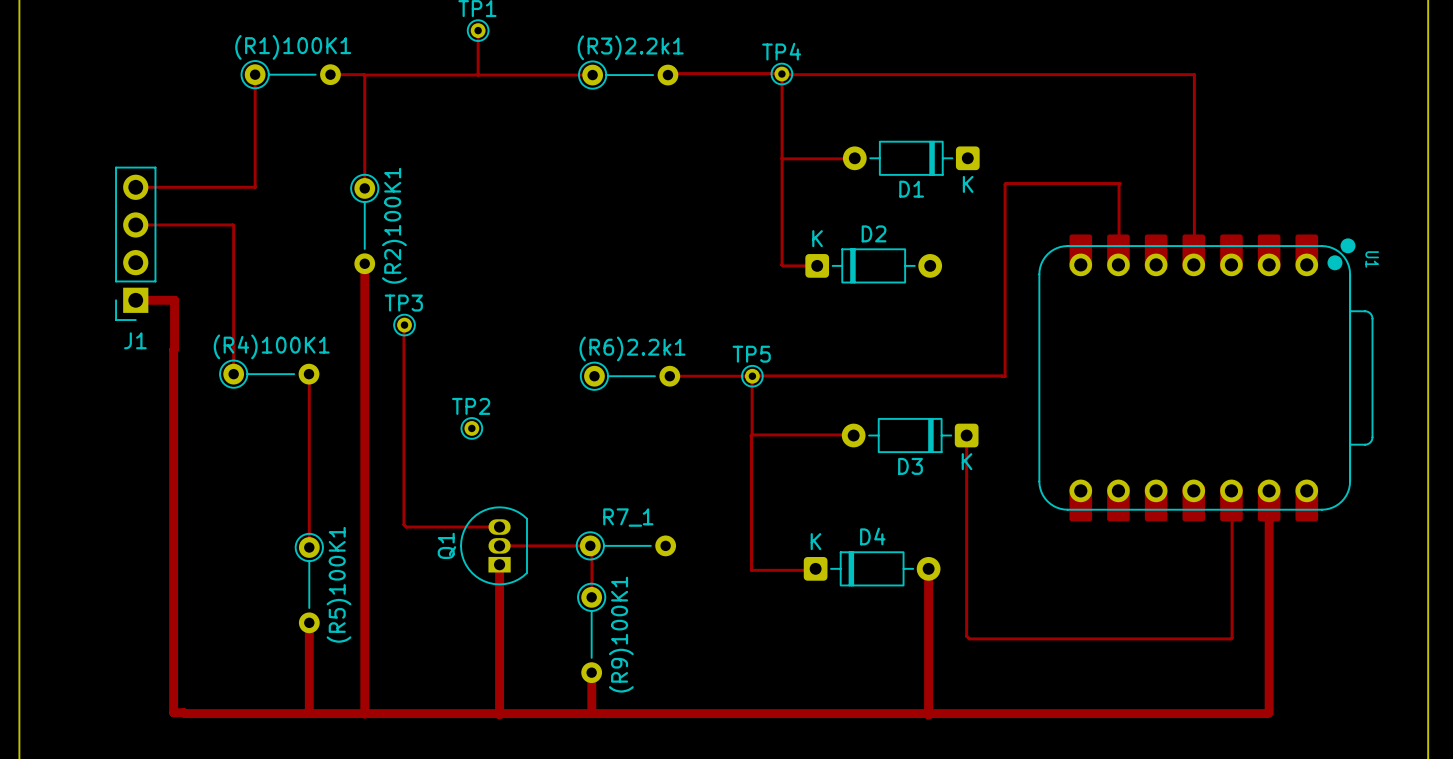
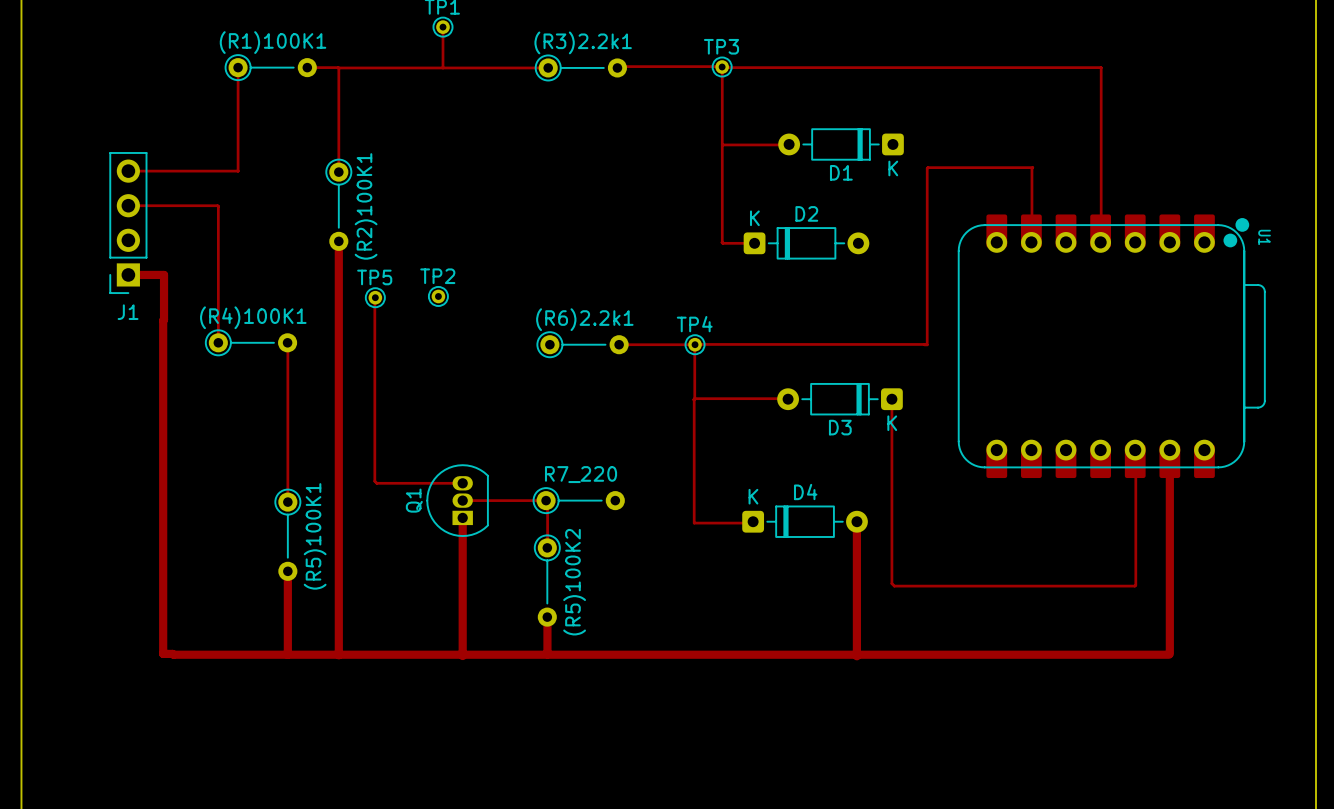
TP4 name: TP4 (781, 51) -> TP3 (721, 46)
TP3 name: TP3 (403, 303) -> TP5 (374, 277)
TP5 name: TP5 (751, 354) -> TP4 (694, 324)
TP2 position: (471, 428) -> (438, 296)
R7_1 name: R7_1 (628, 517) -> R7_220 (581, 474)
(R9)100K1 name: (R9)100K1 (621, 634) -> (R5)100K2 (574, 582)

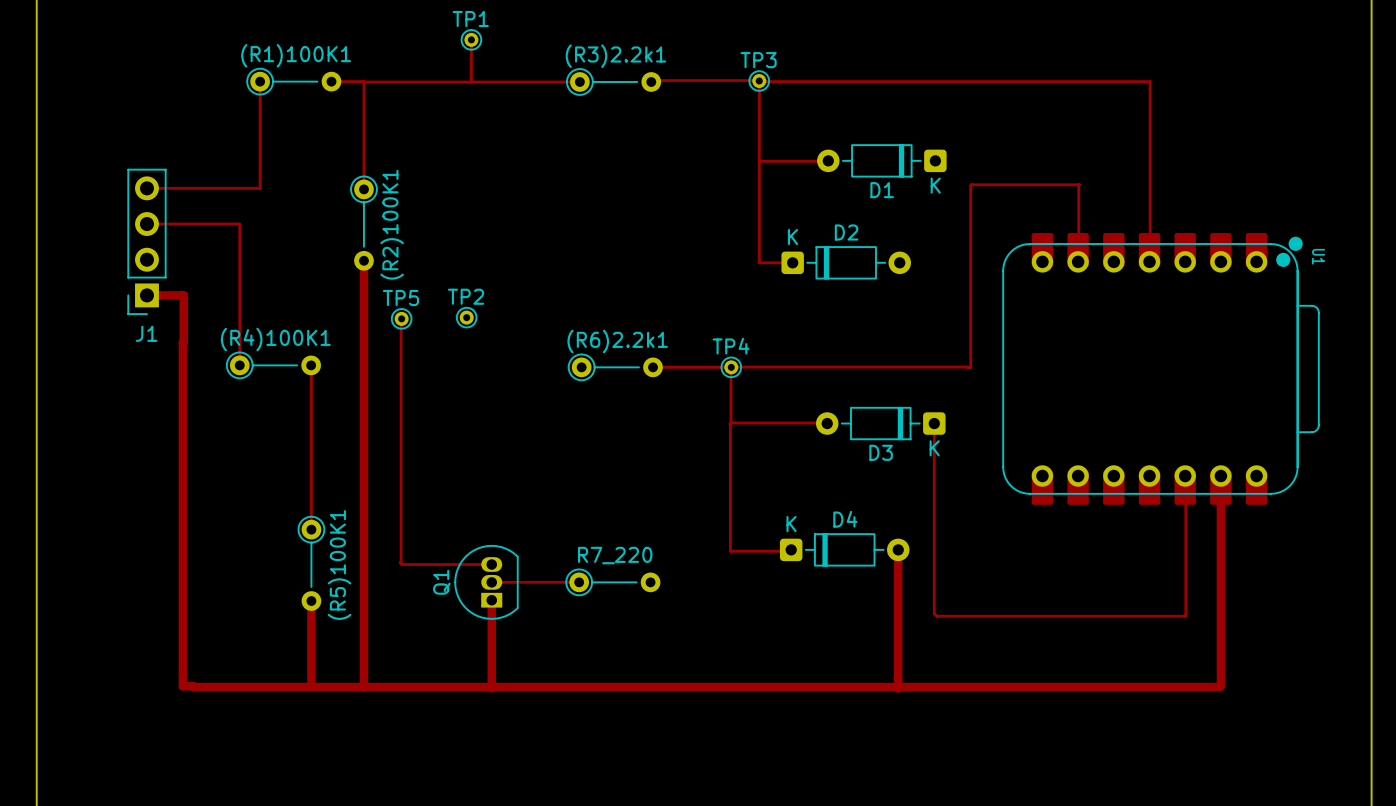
track: (374, 481) (376, 483) (462, 483) -> (401, 508) (400, 562) (402, 564) (491, 564)
Q1 position: (457, 500) -> (486, 582)
track: (462, 500) (547, 499) (547, 542) -> none
R7_220 position: (578, 500) -> (612, 582)
track: none -> (491, 582) (579, 582)
(R5)100K2: (547, 580) -> none
track: (547, 611) (547, 654) -> none

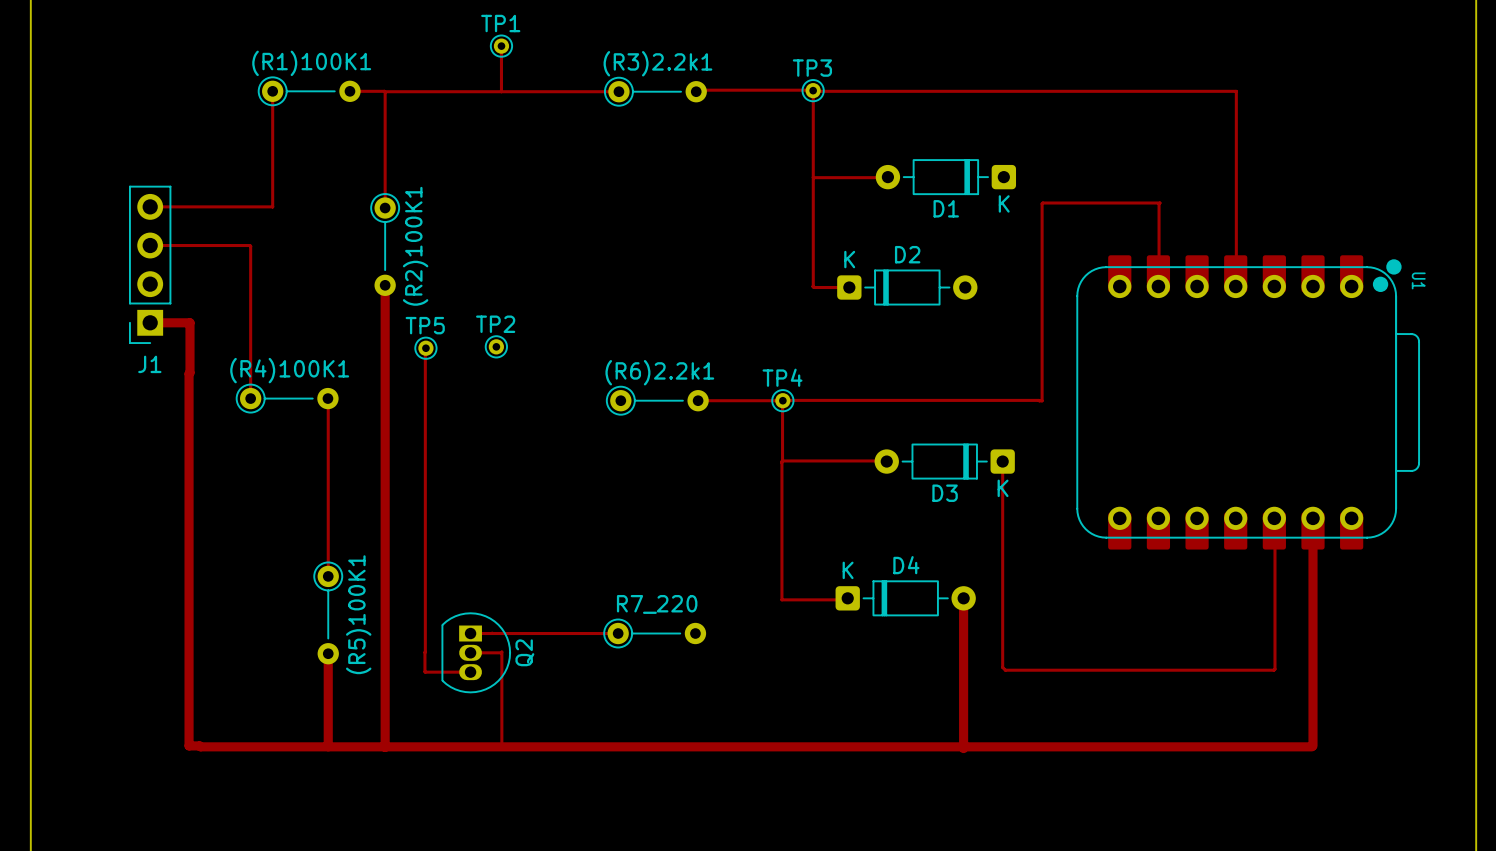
track: (401, 562) (402, 564) (491, 564) -> (425, 611) (424, 671) (470, 672)
track: none -> (470, 633) (523, 633)
Q1: (486, 582) -> none
track: none -> (470, 652) (501, 652) (501, 748)
Q2: none -> (476, 652)
track: (491, 600) (491, 688) -> none

